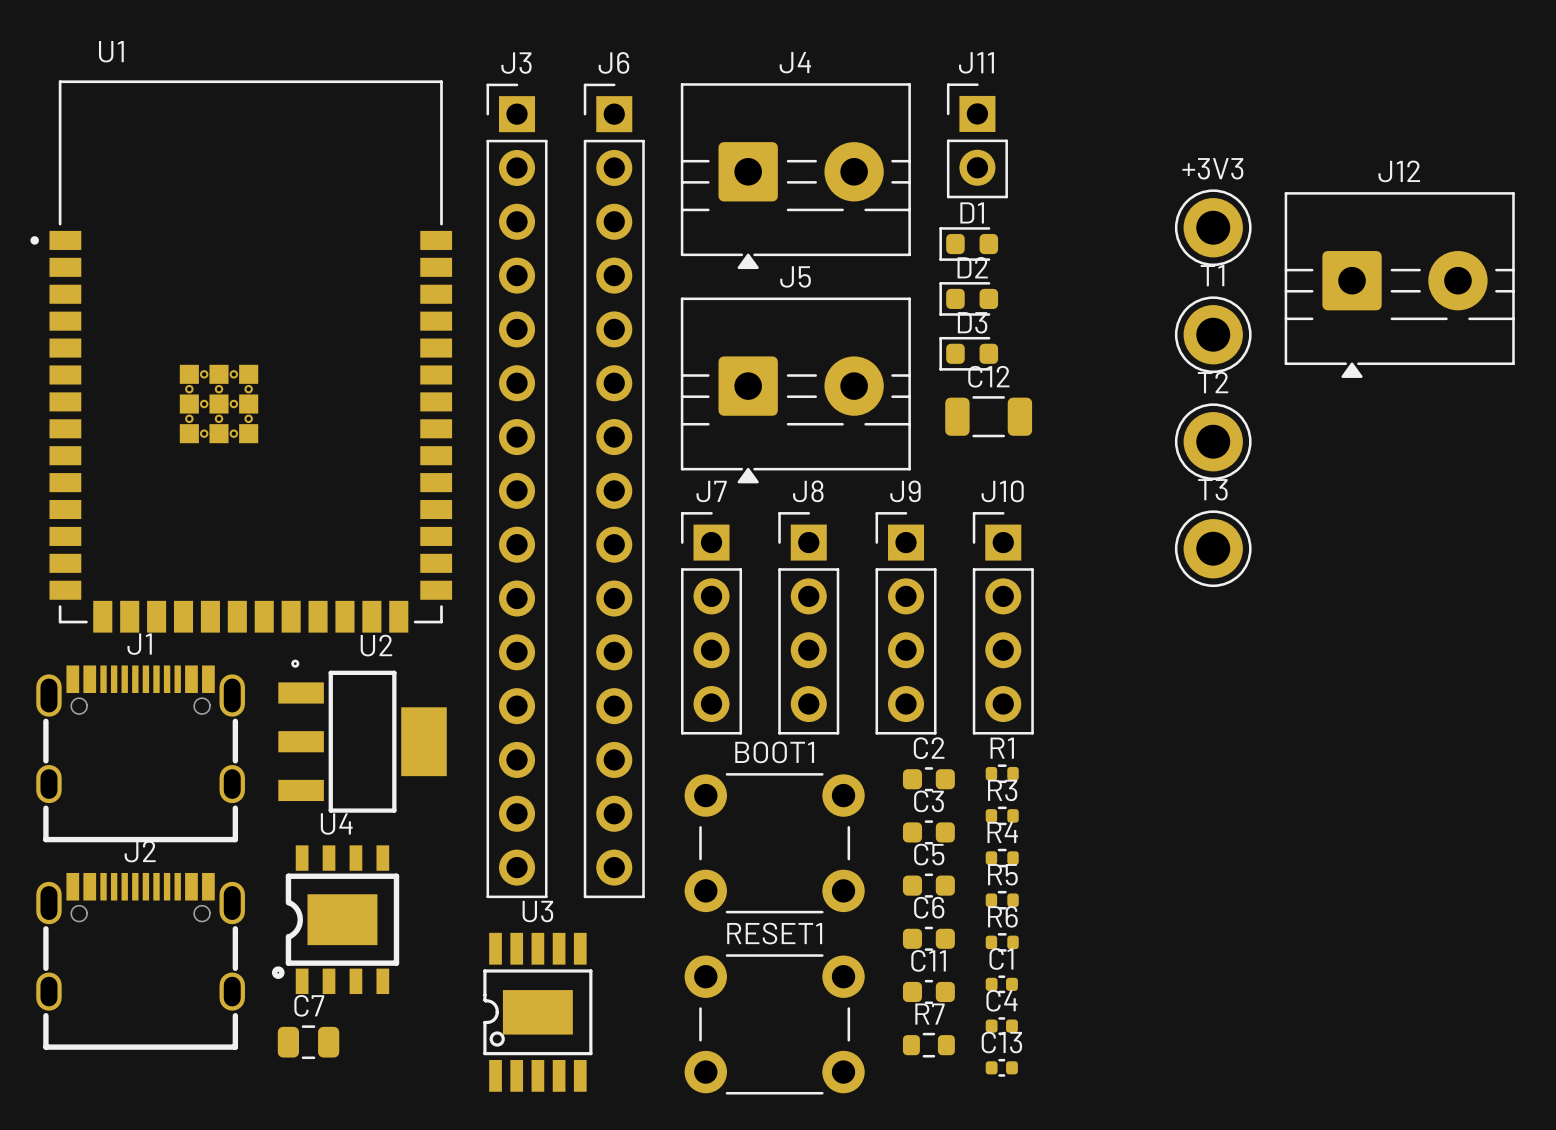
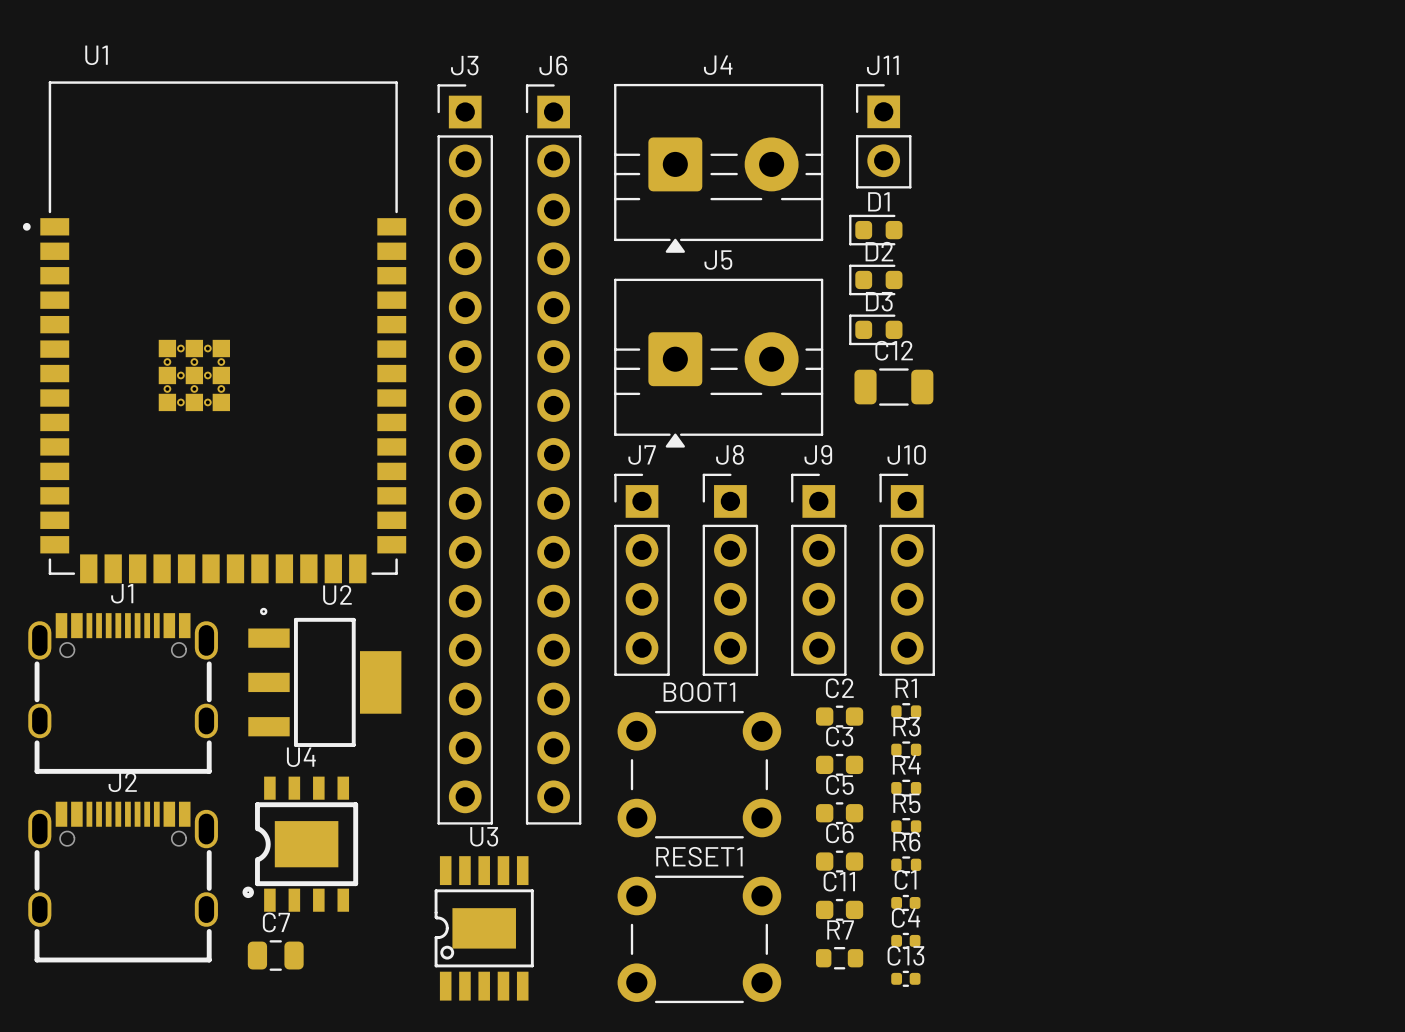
+3V3: (1213, 227) -> none
J12: (1399, 285) -> none
T1: (1213, 334) -> none
T2: (1213, 441) -> none
T3: (1213, 548) -> none

